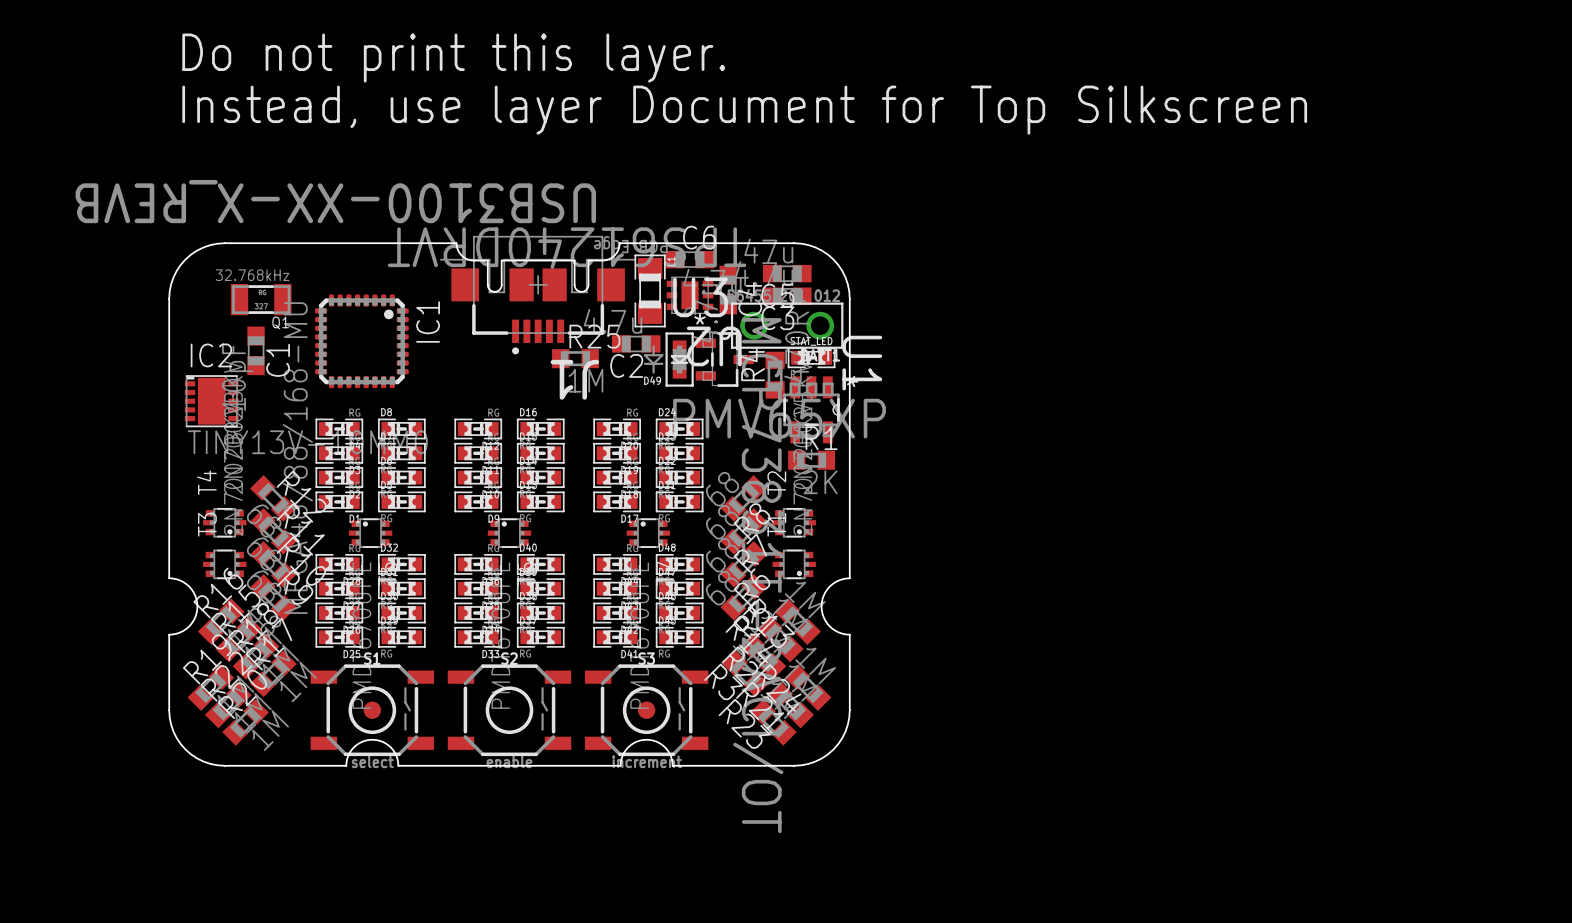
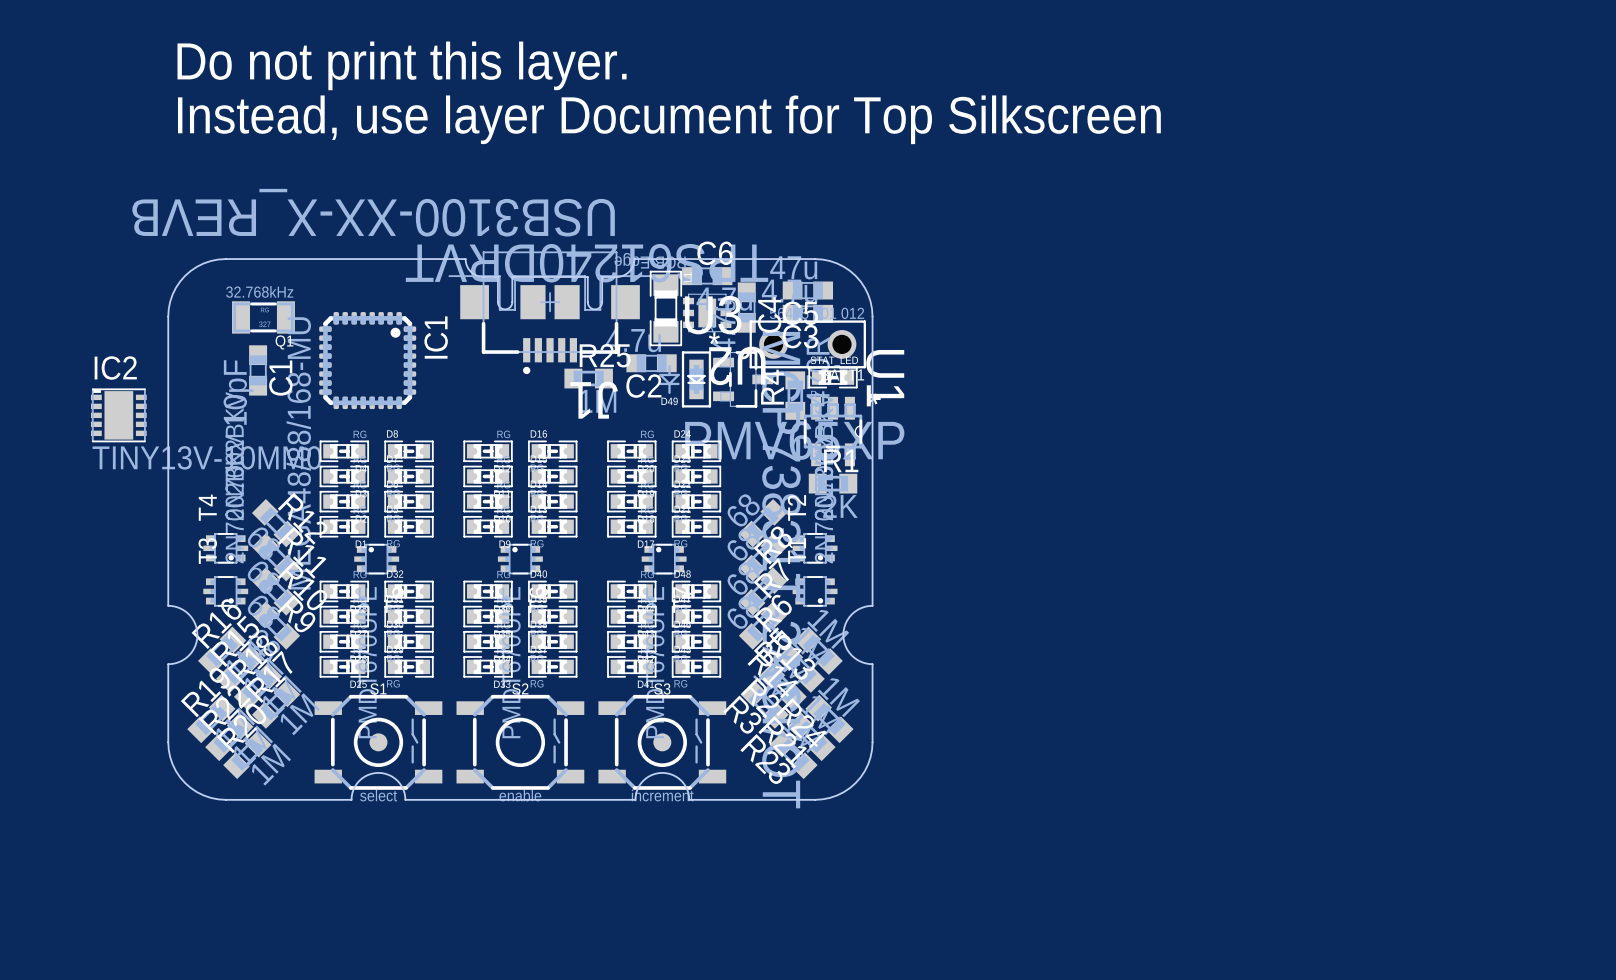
IC2 position: (211, 401) -> (118, 415)

